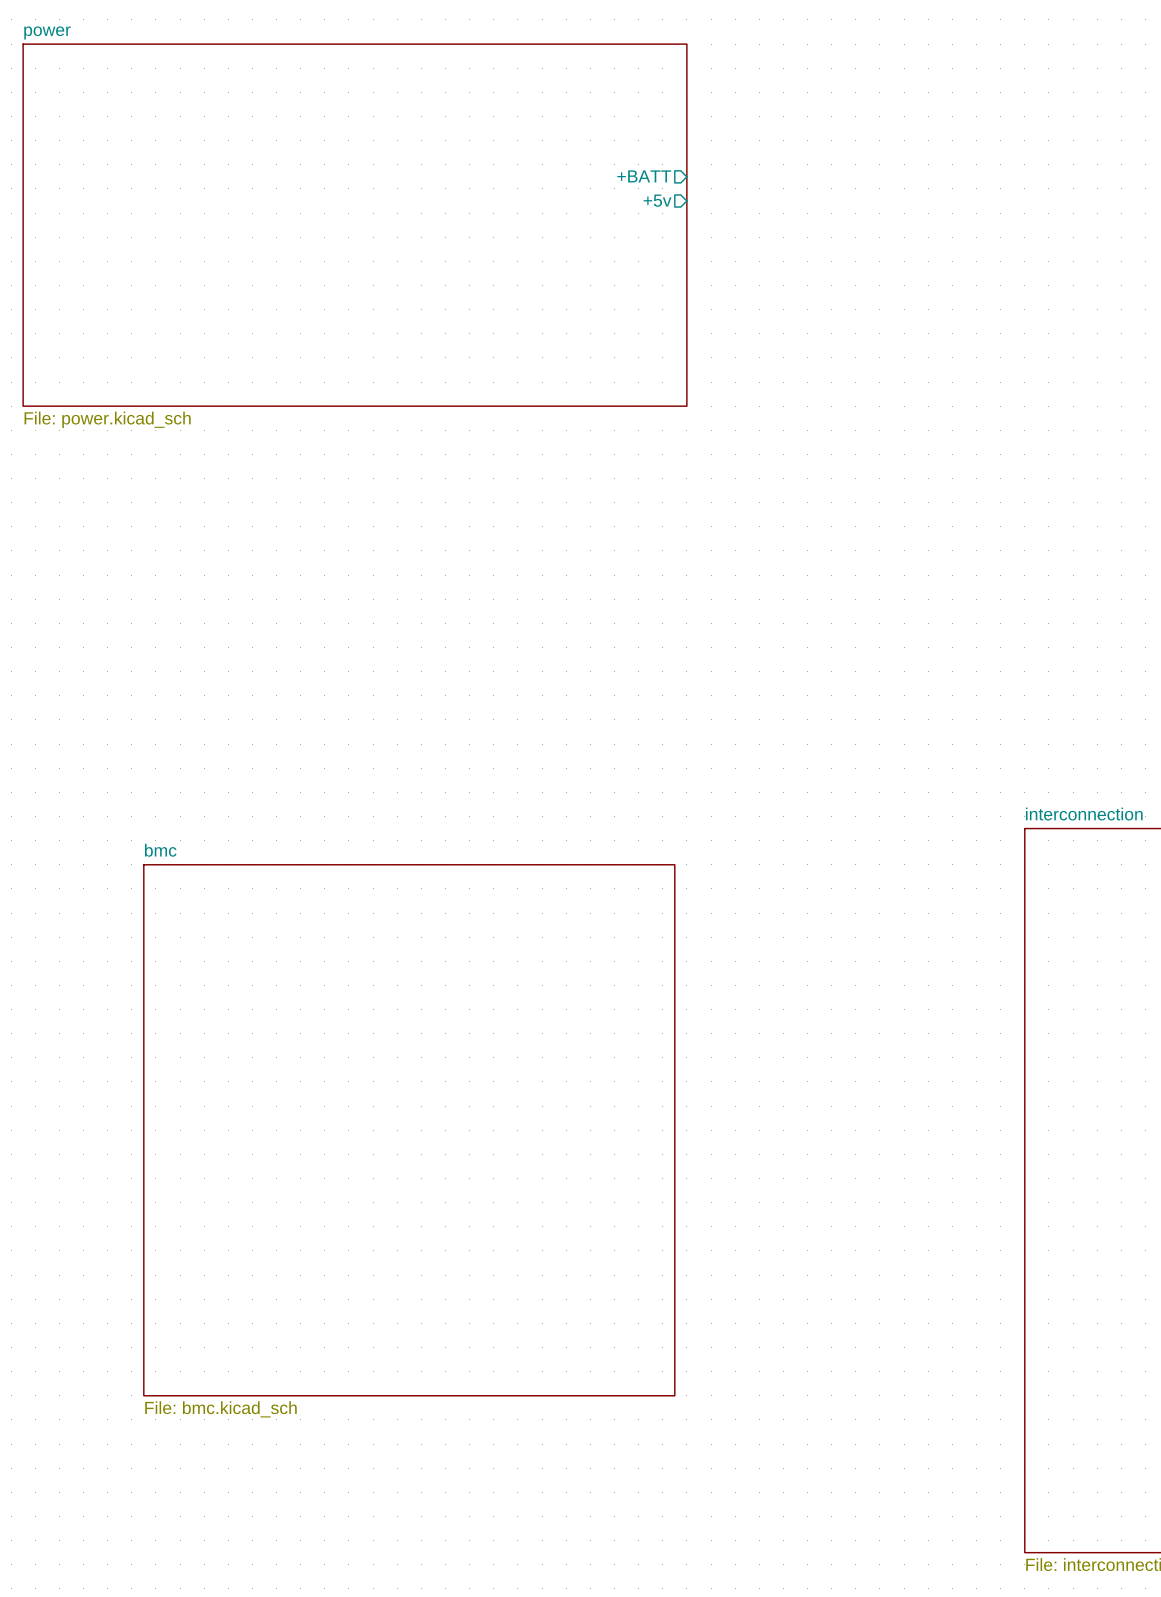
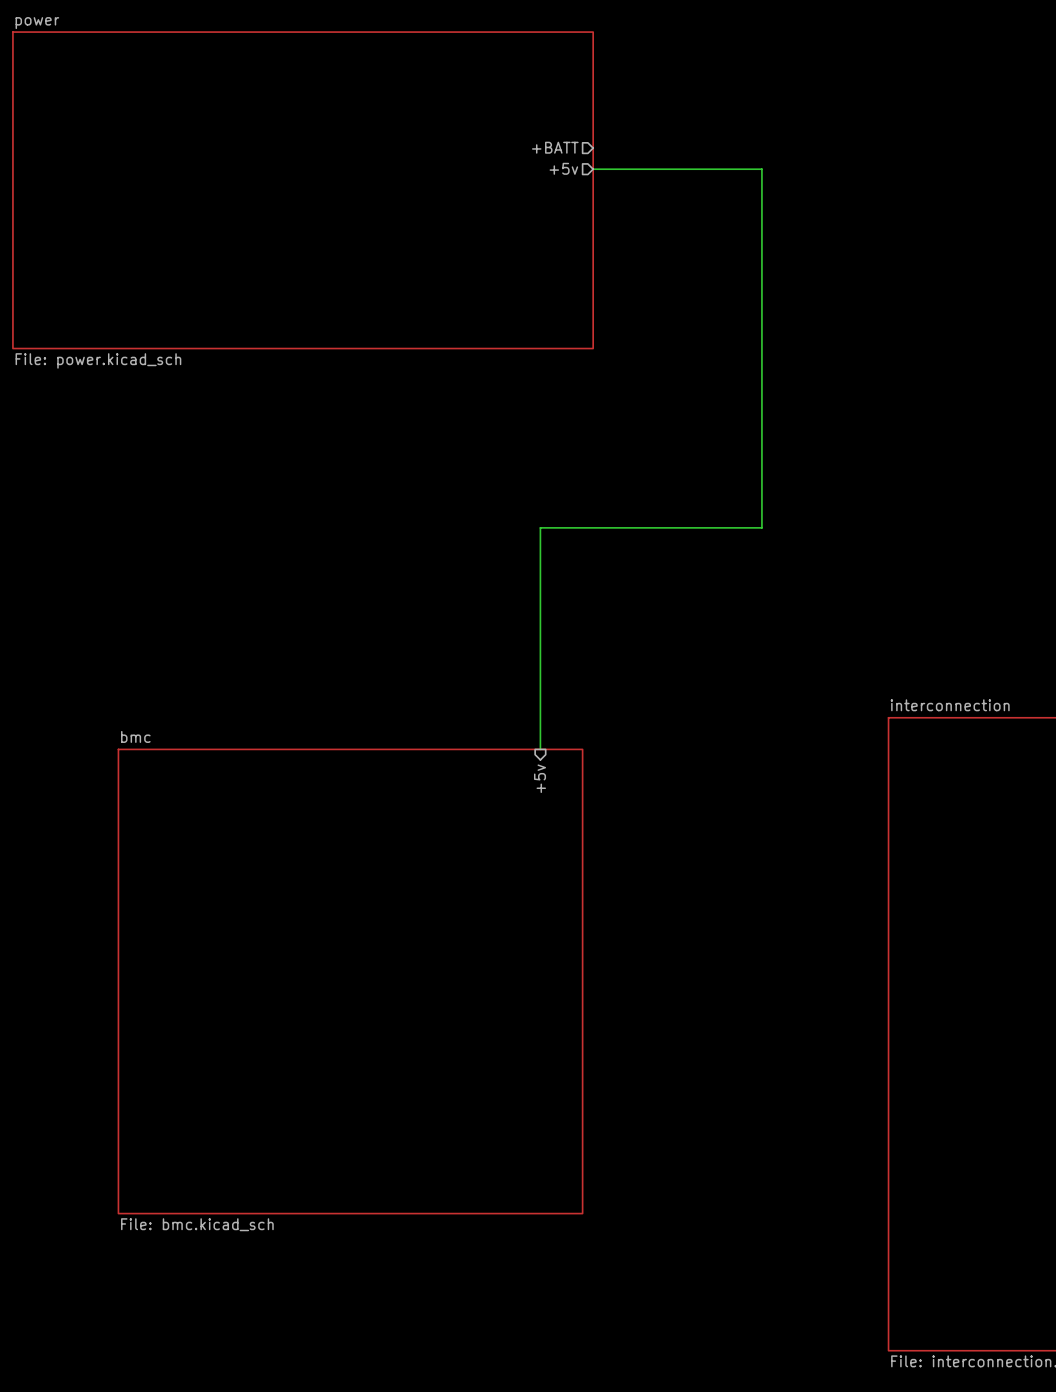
wire: none -> (593, 169) (761, 169) (761, 527) (540, 527) (540, 749)
sheet pin: none -> +5v (540, 778)

